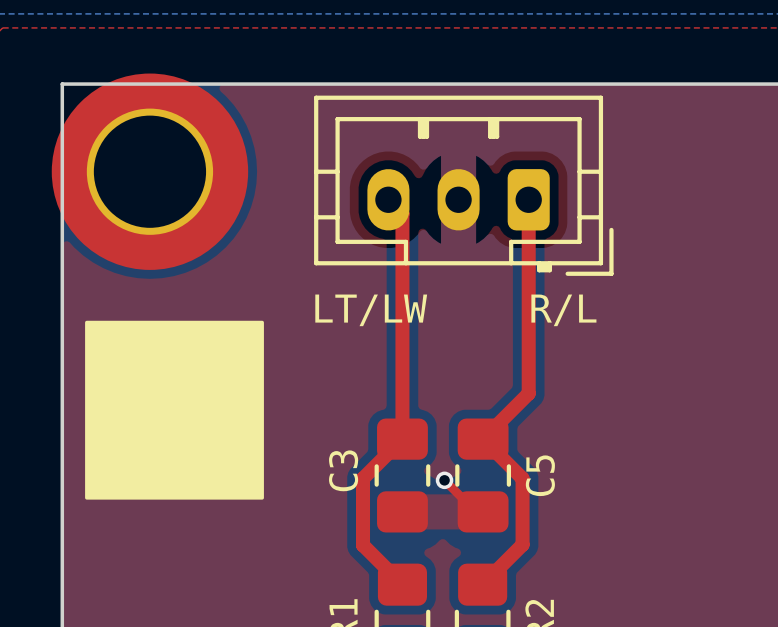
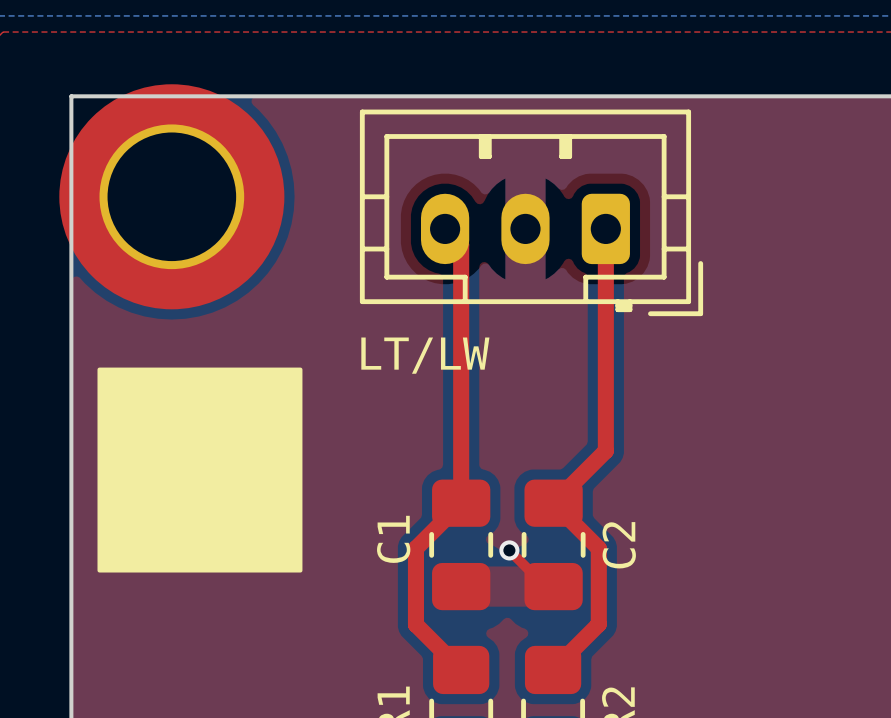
text: R/L (563, 310) -> none
C3 name: C3 (343, 470) -> C1 (393, 539)
C5 name: C5 (540, 475) -> C2 (619, 545)

